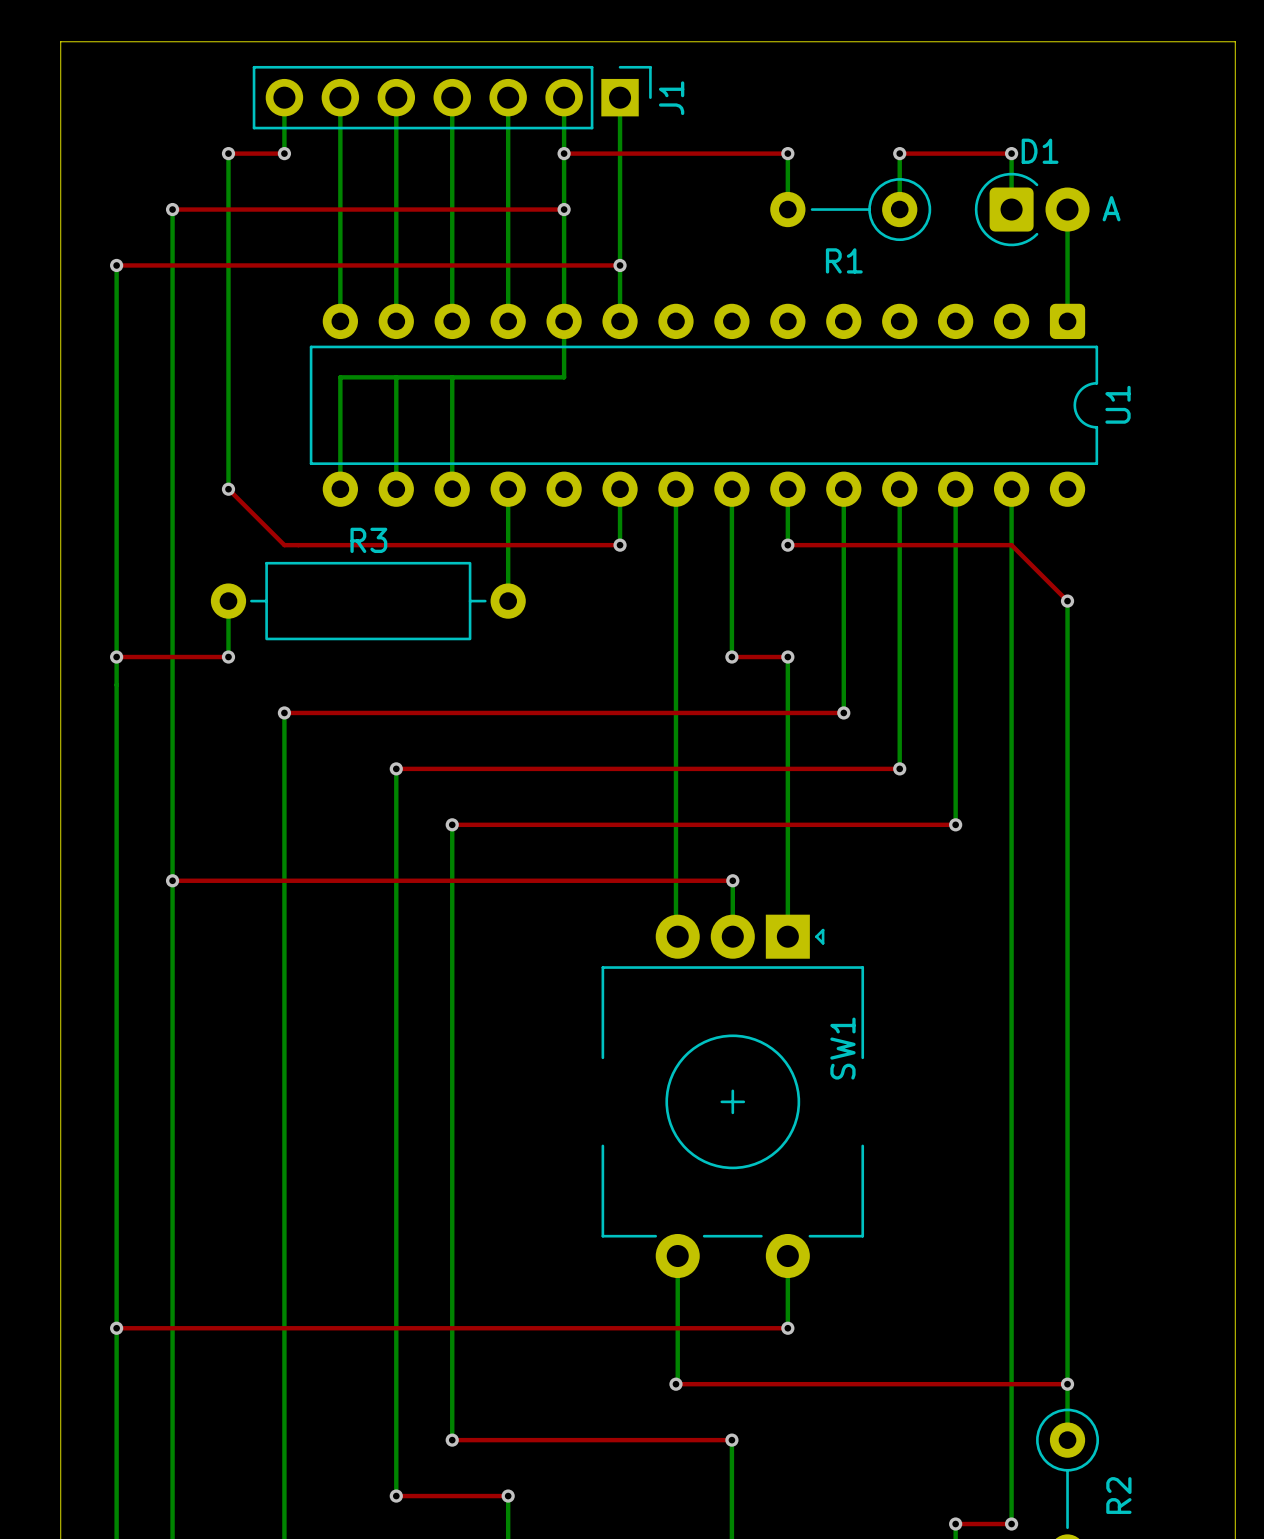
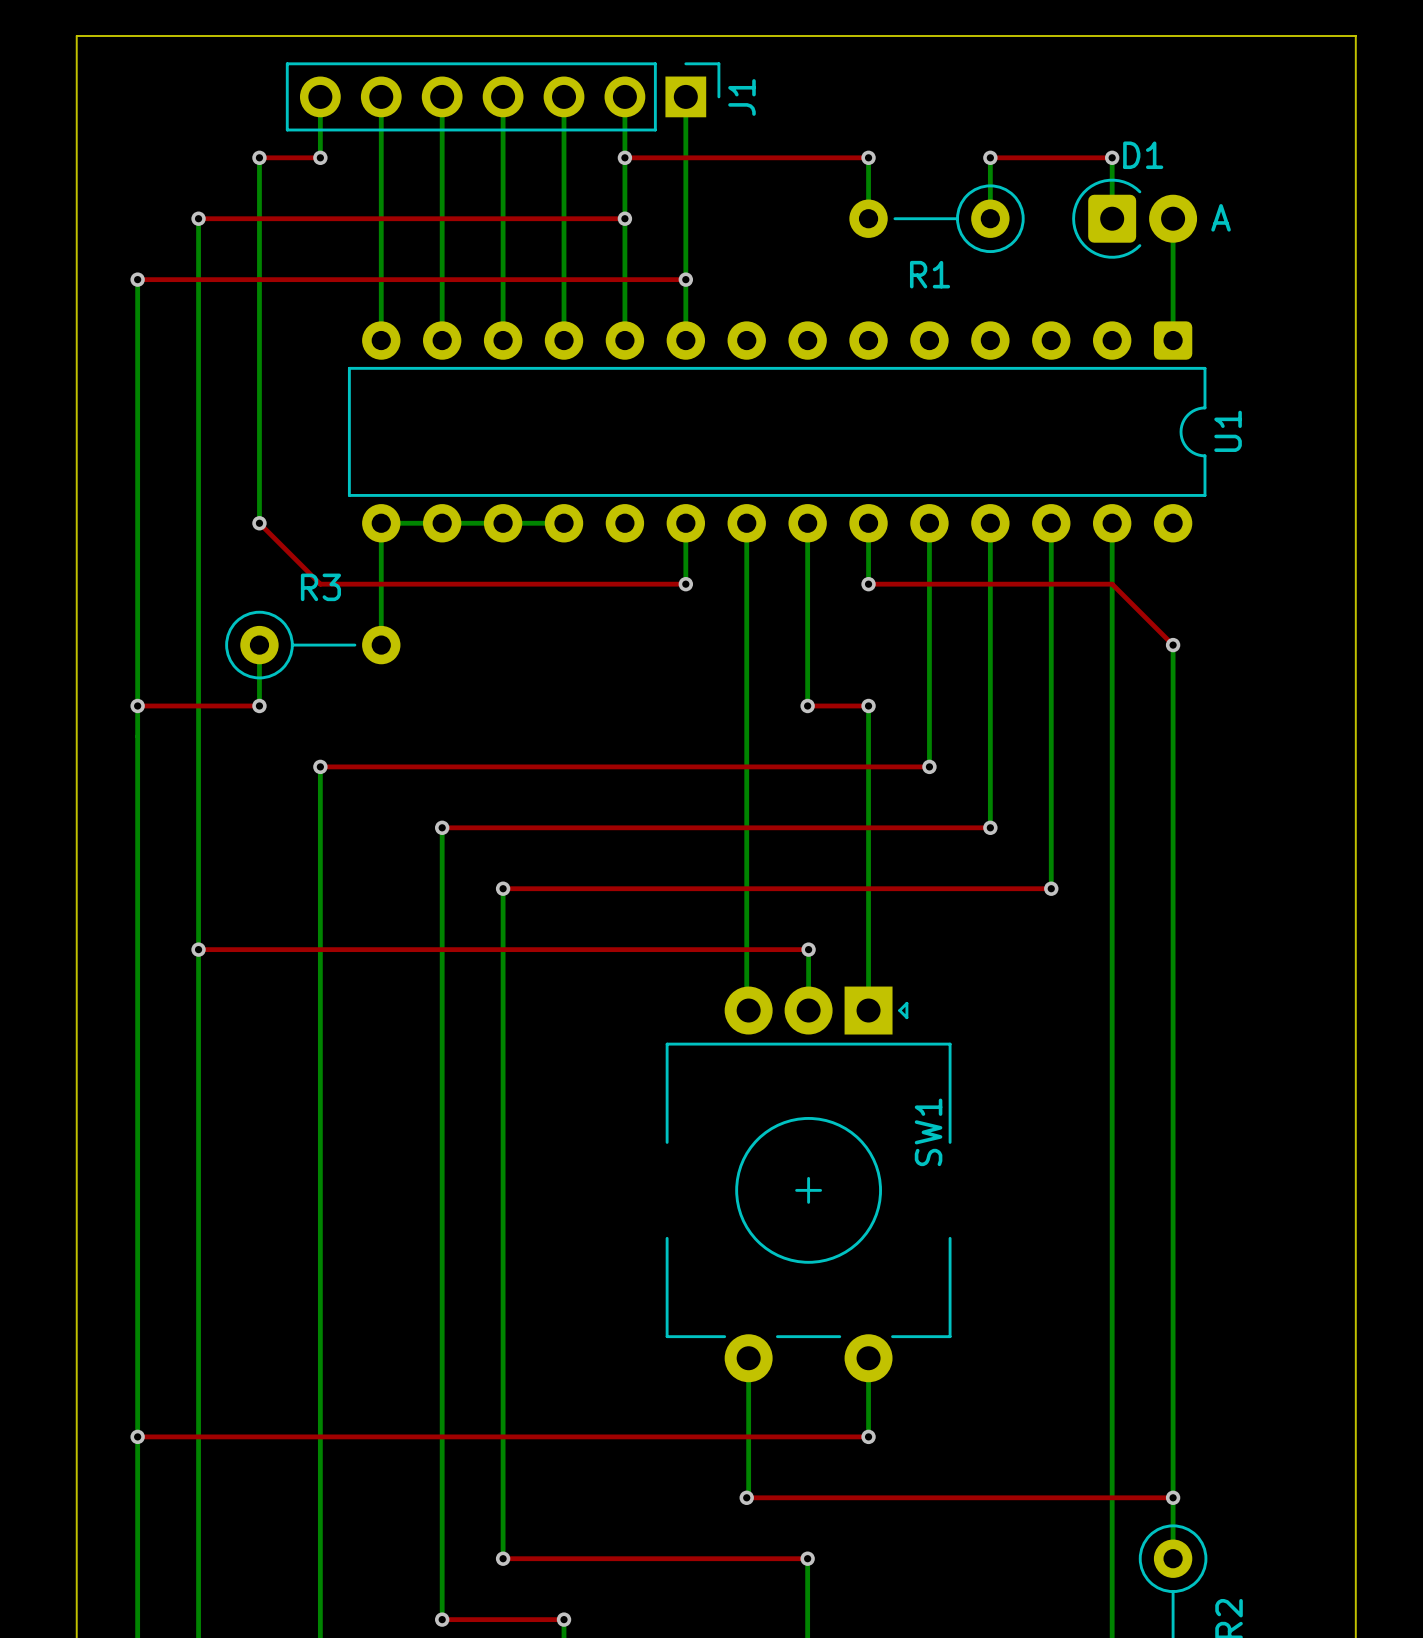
bottom track: (564, 321) (564, 377) (340, 377) (340, 489) -> none
bottom track: (396, 377) (396, 489) -> none
bottom track: (452, 377) (452, 489) -> none
bottom track: (508, 489) (508, 601) -> (564, 523) (381, 523) (381, 645)
R3 footprint: [210, 561, 526, 641] -> [225, 610, 401, 680]

